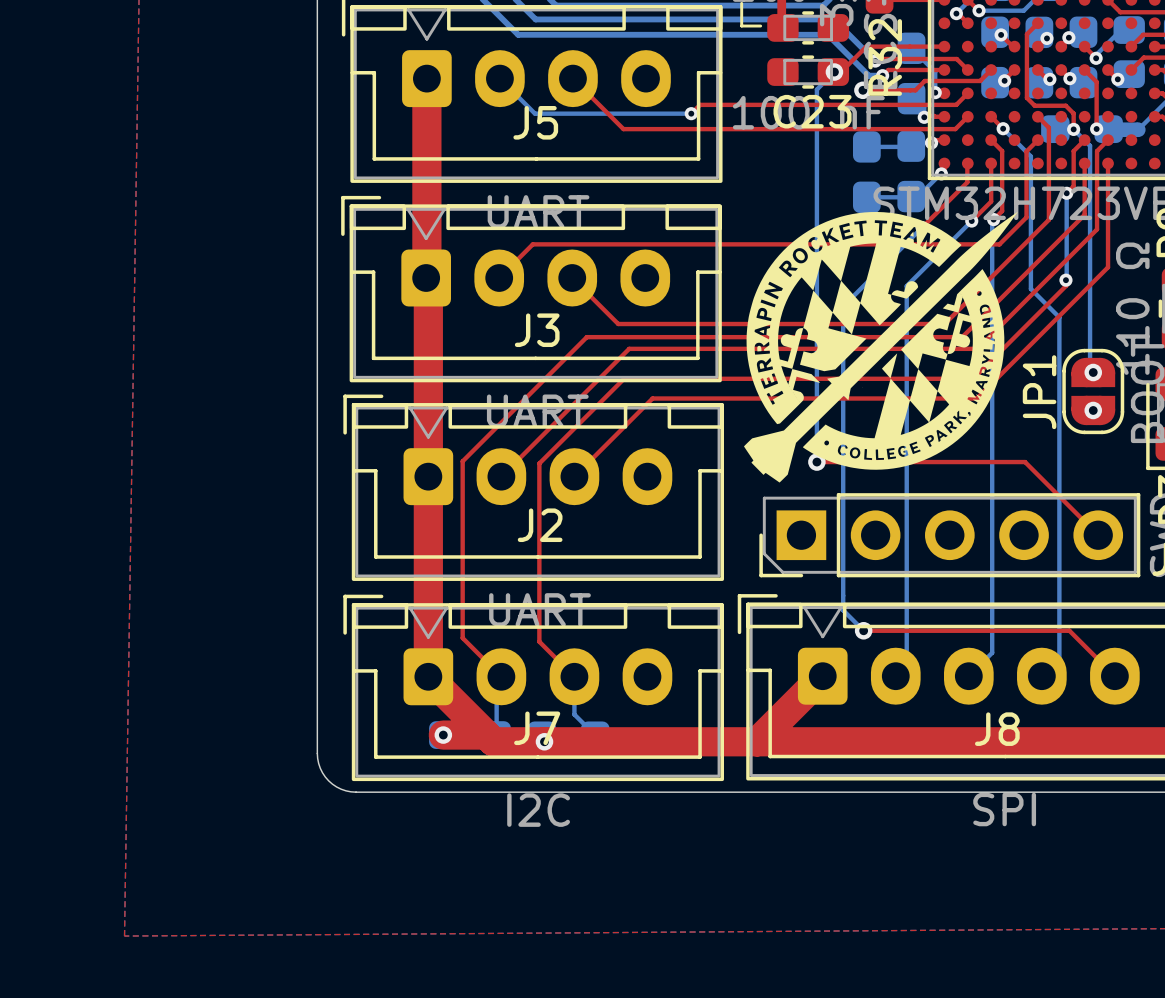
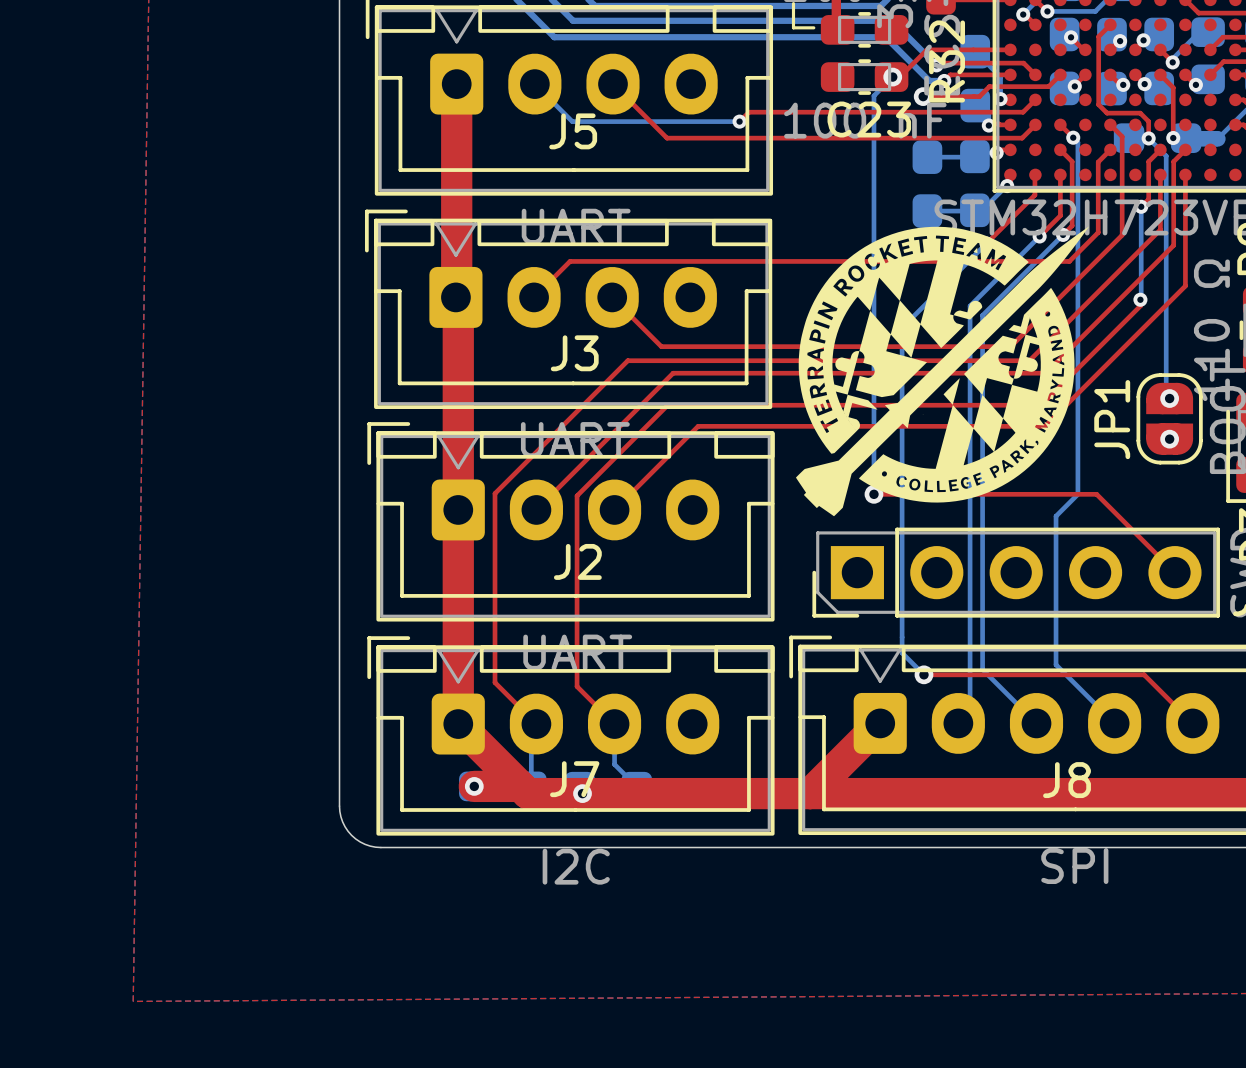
bottom track: (1007, 133) (1030, 156) (1030, 288) (1059, 317) (1059, 658) (1041, 676) -> (1077, 142) (1077, 494) (1056, 516) (1056, 664) (1114, 723)
bottom track: (992, 221) (992, 652) (968, 676) -> (1061, 236) (982, 315) (982, 669) (1036, 723)

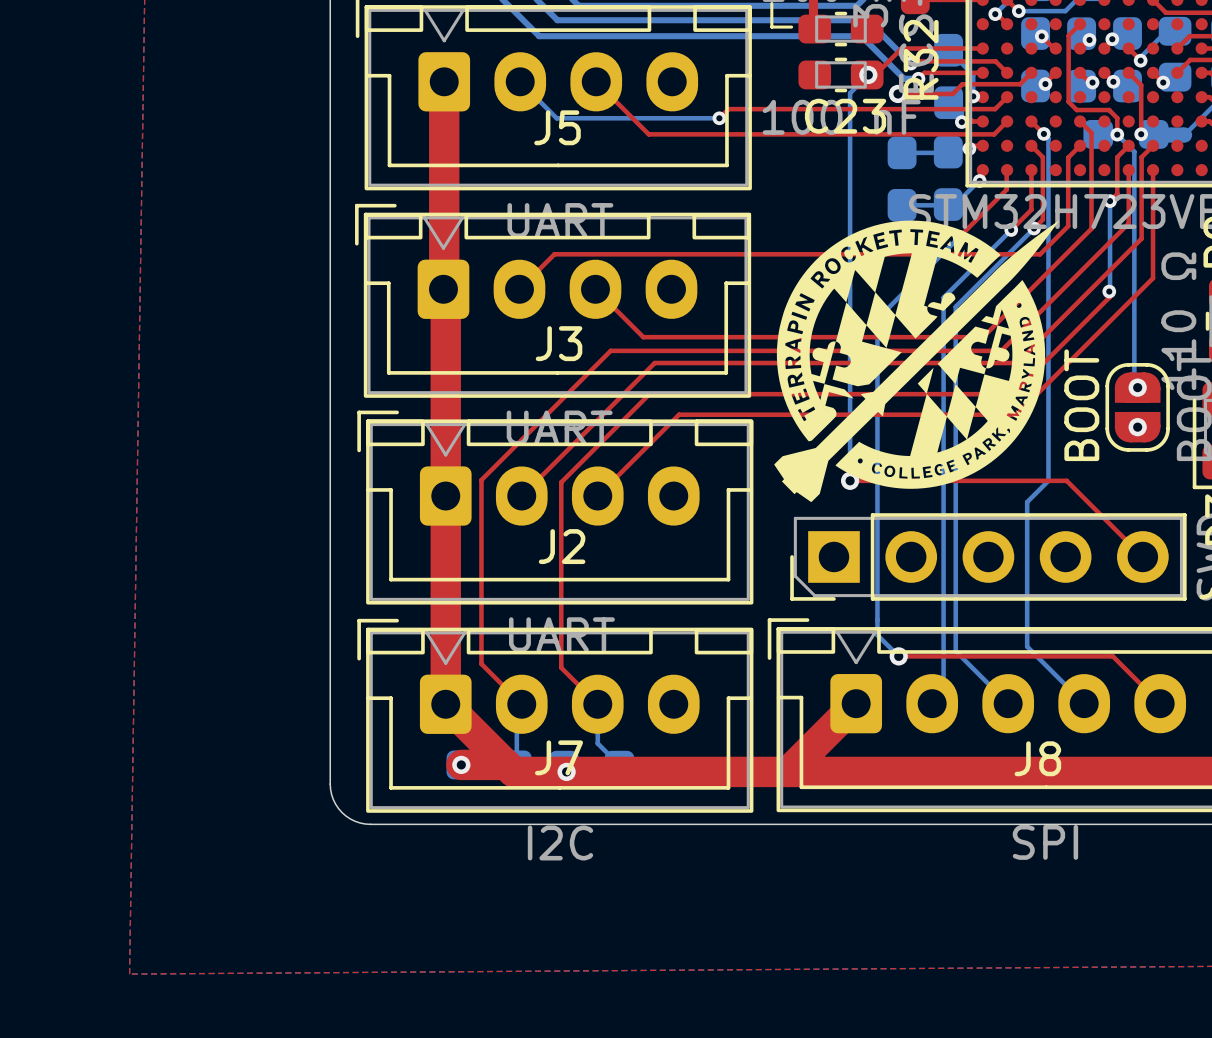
JP1 name: JP1 (1112, 419) -> BOOT (1081, 405)

